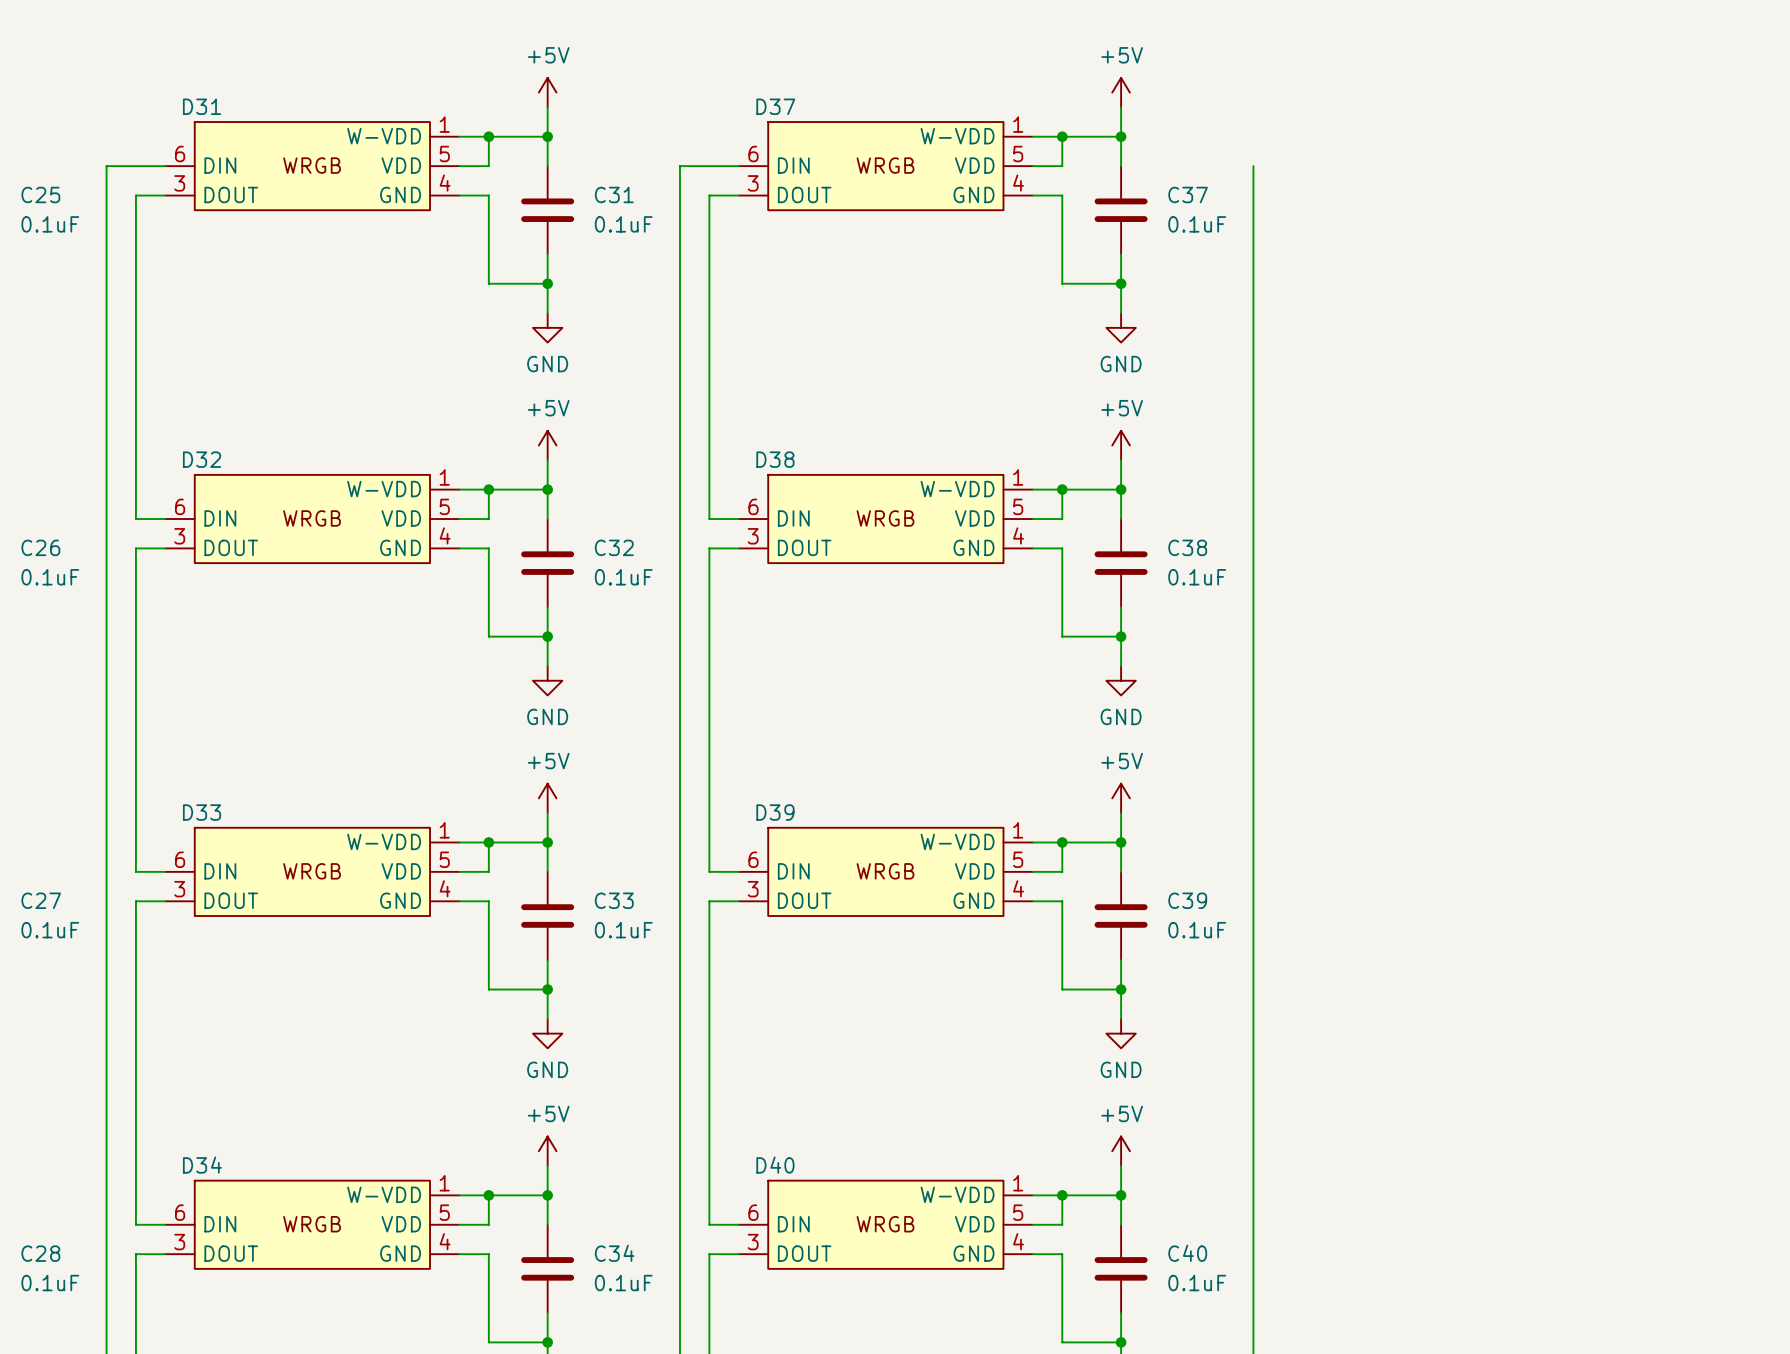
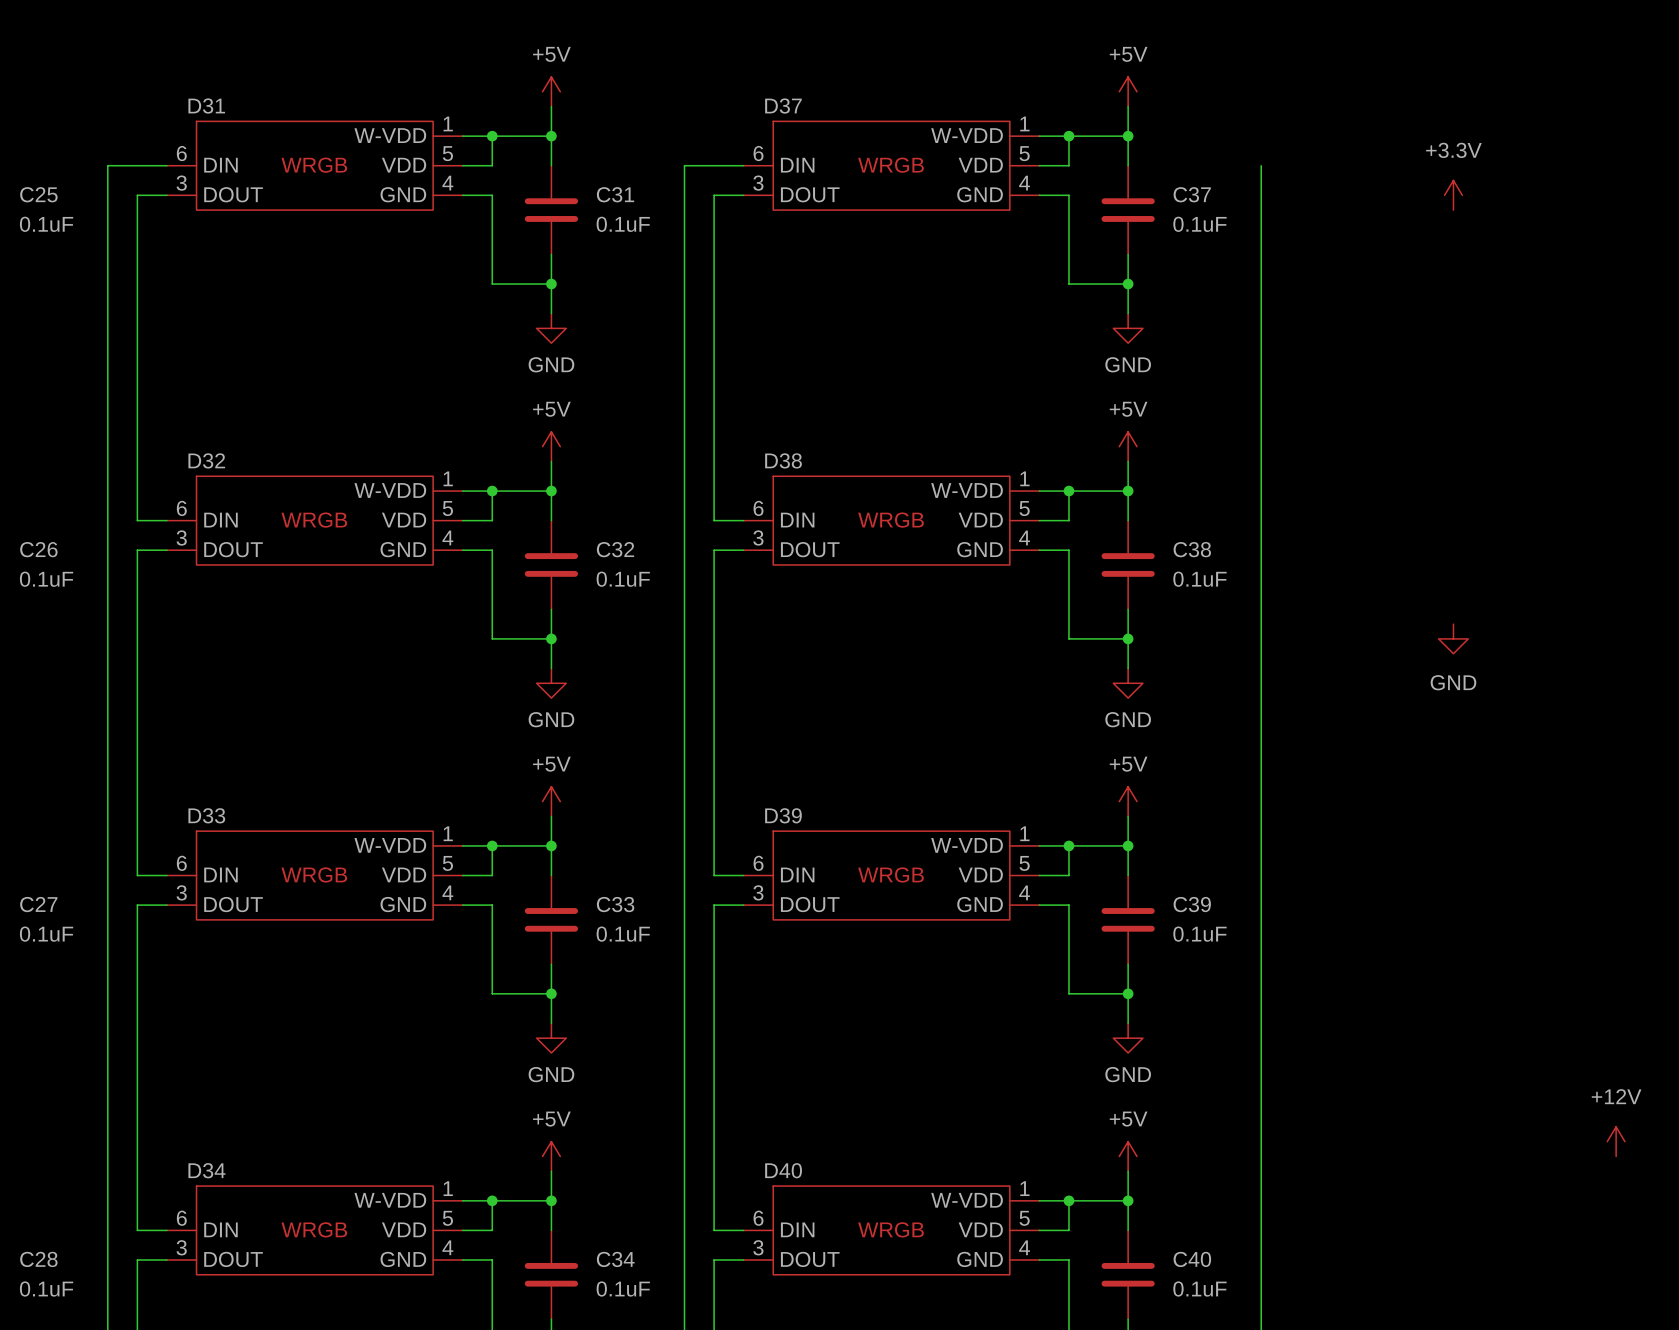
power symbol: none -> +3.3V (1453, 195)
power symbol: none -> GND (1453, 638)
power symbol: none -> +12V (1616, 1141)

